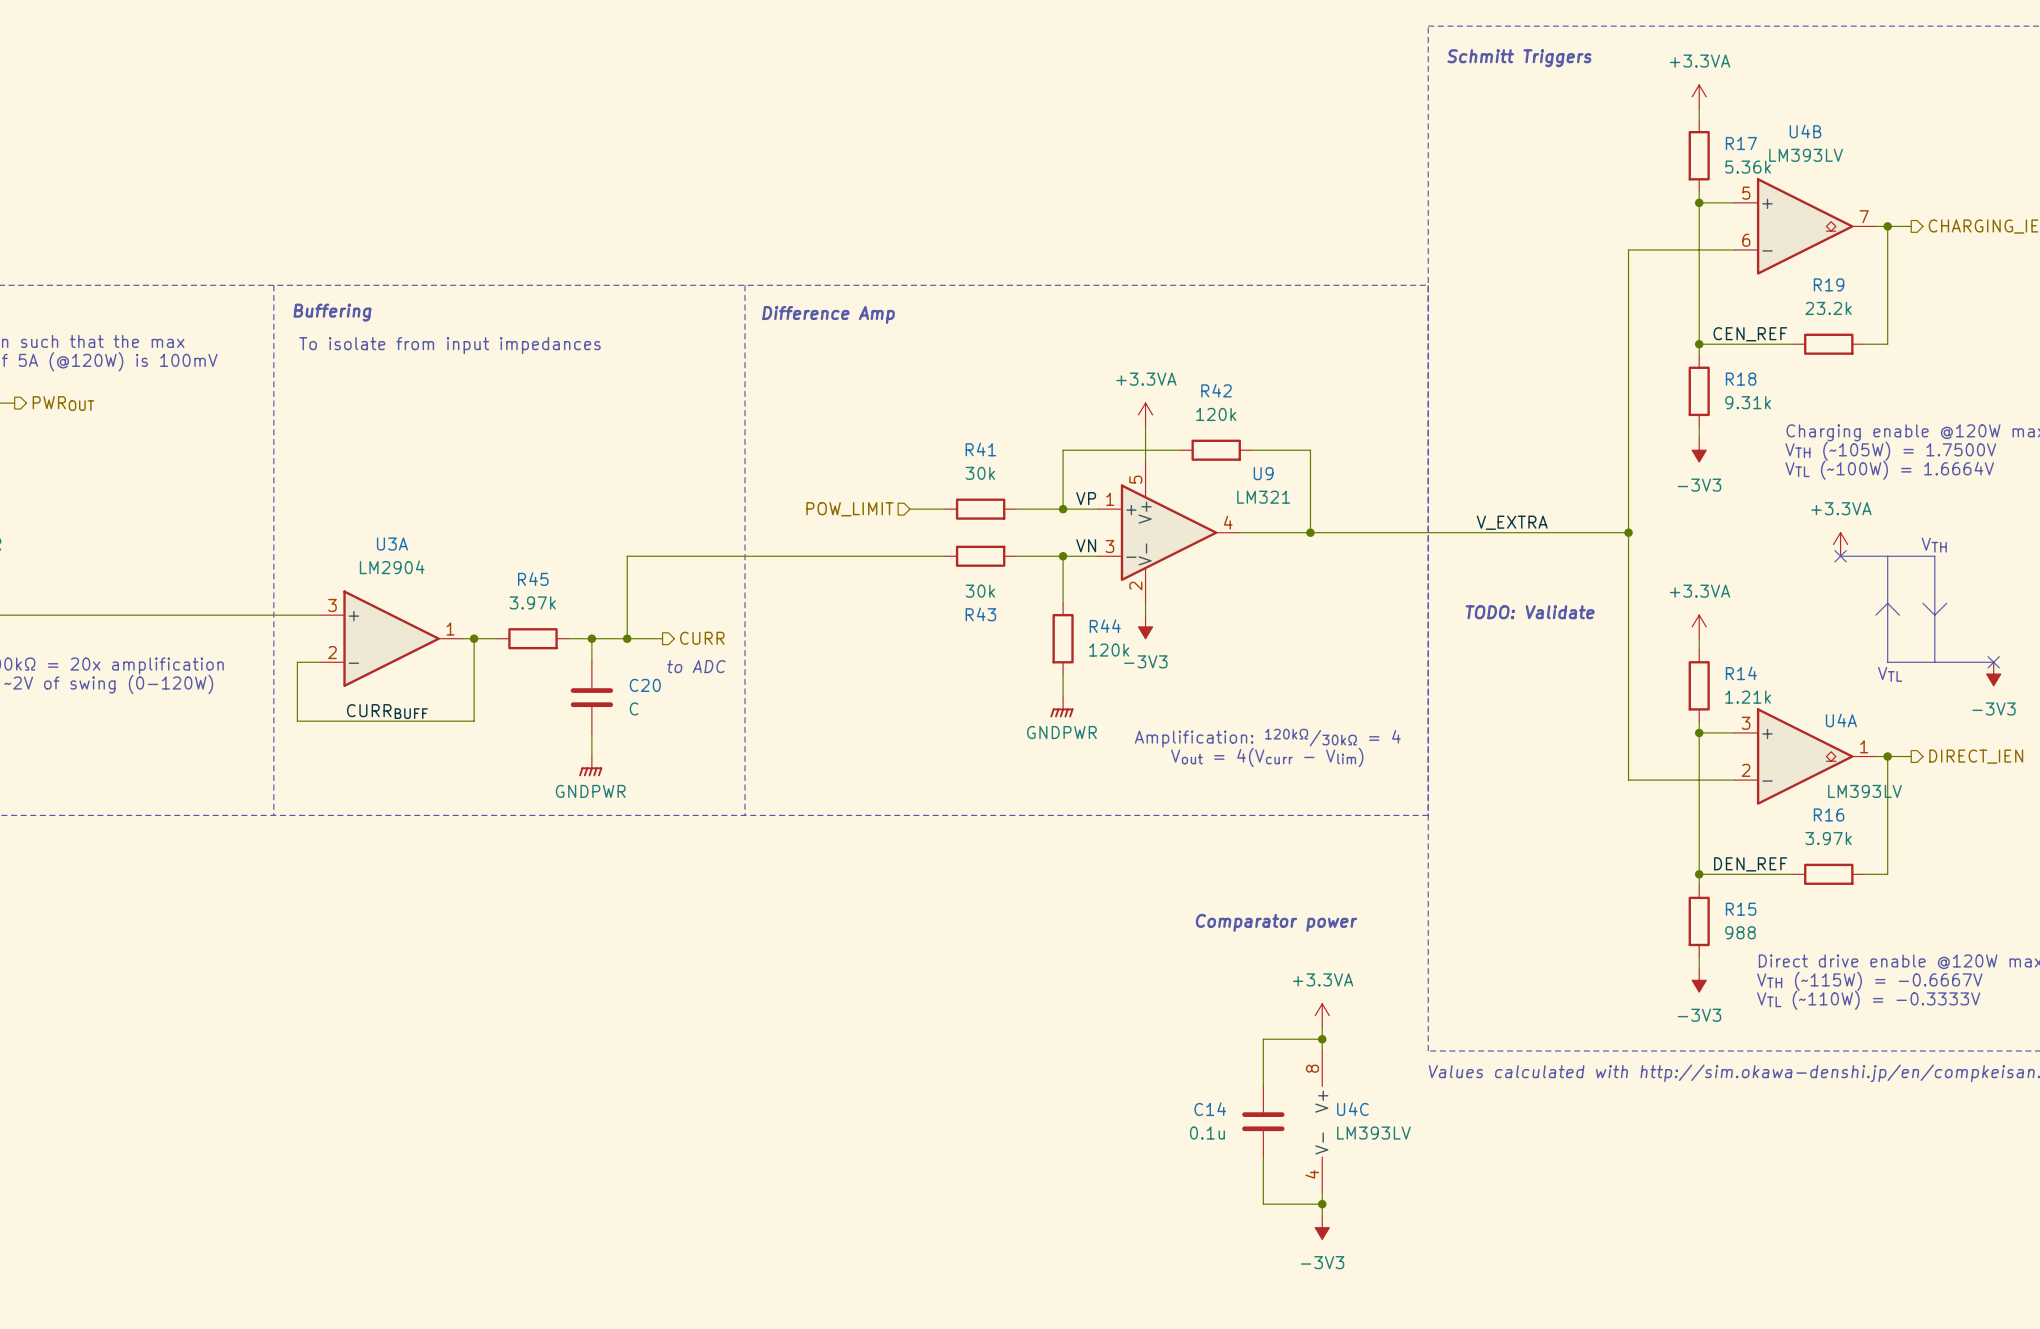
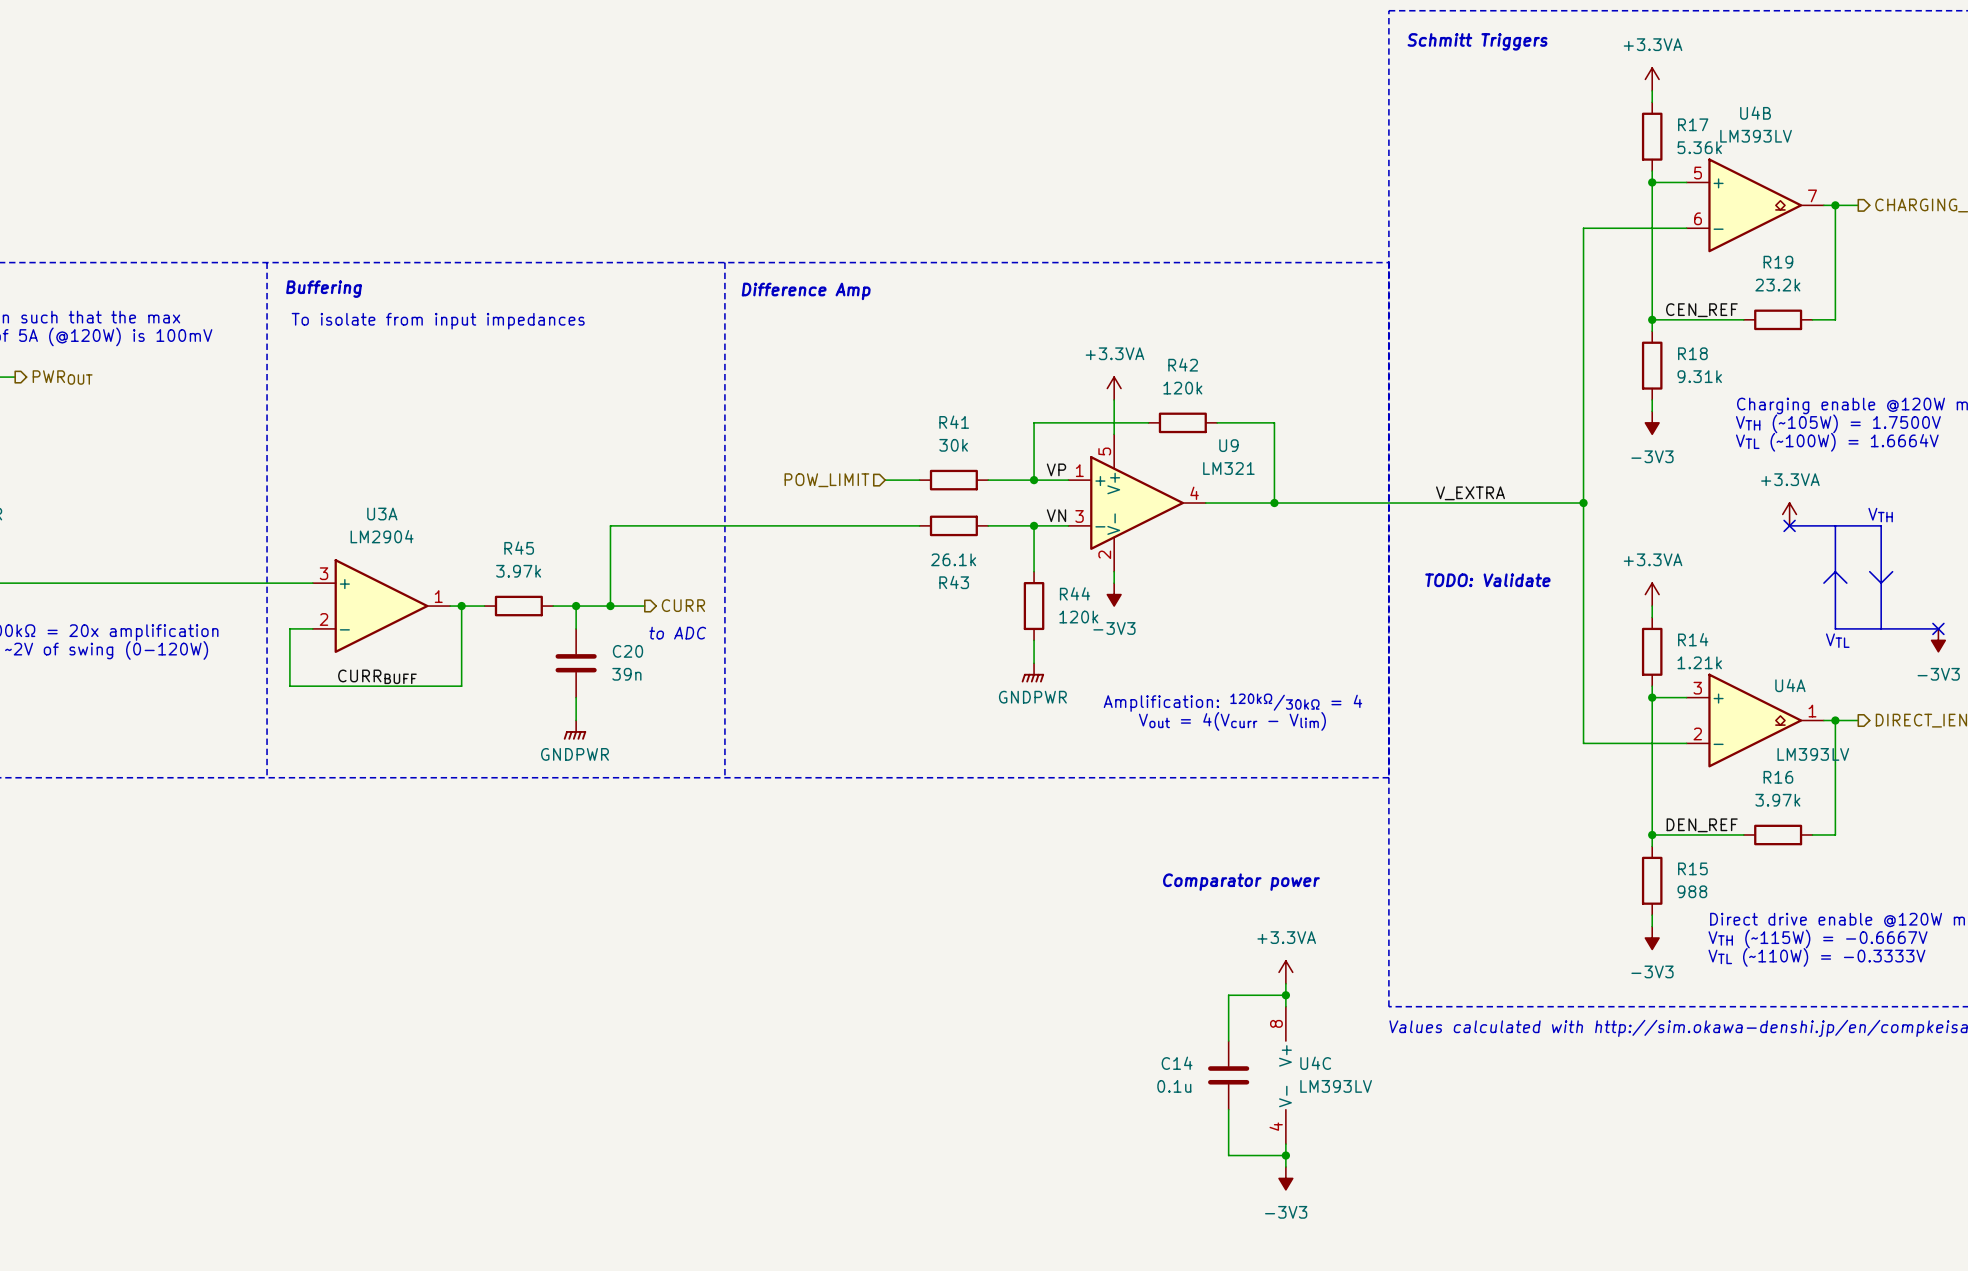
R43 value: 30k (980, 591) -> 26.1k (953, 559)
C20 value: C (634, 708) -> 39n (626, 674)

